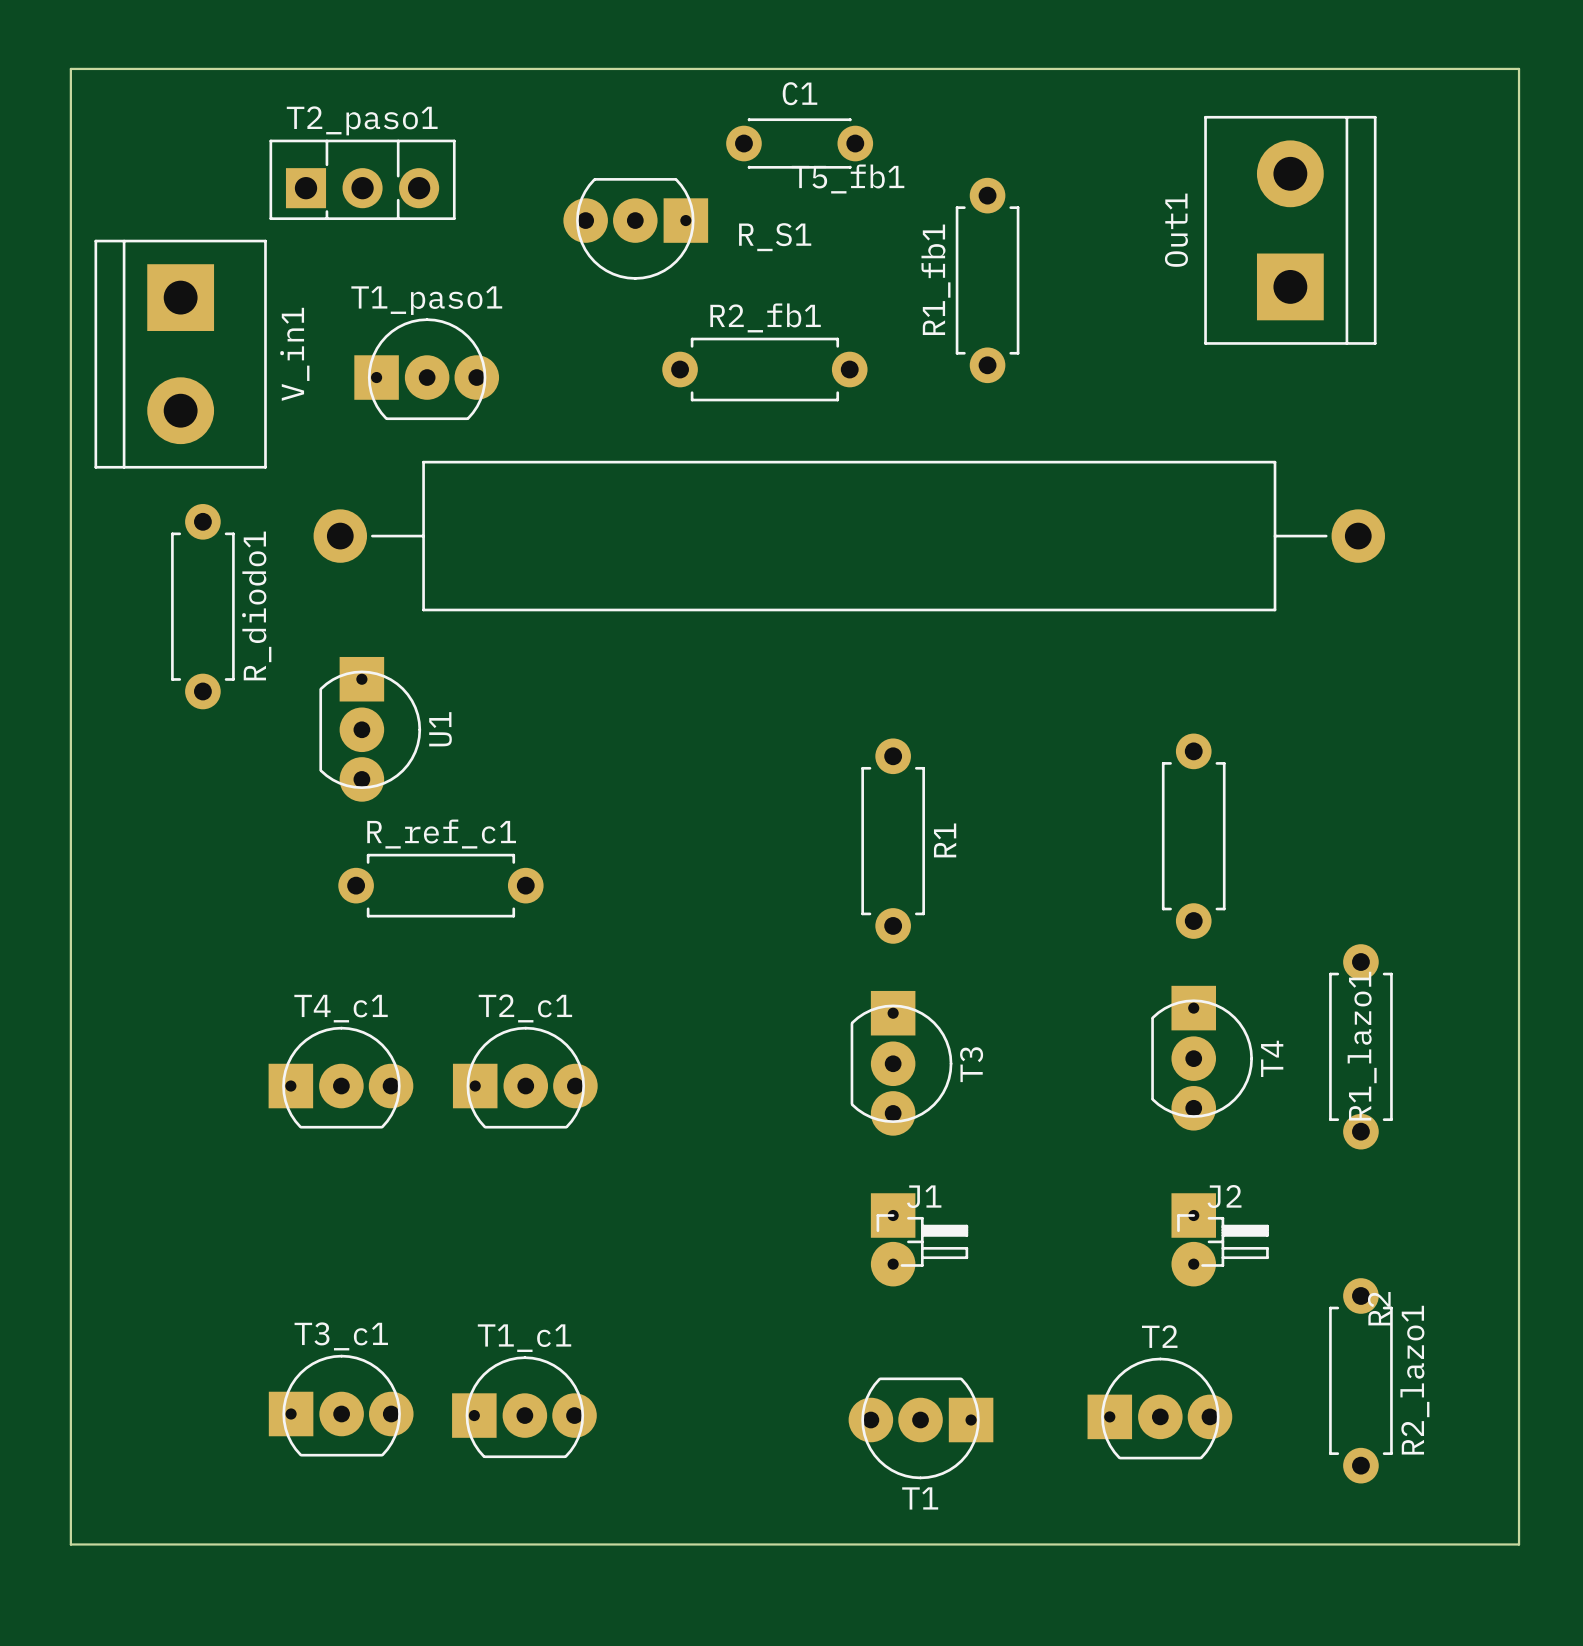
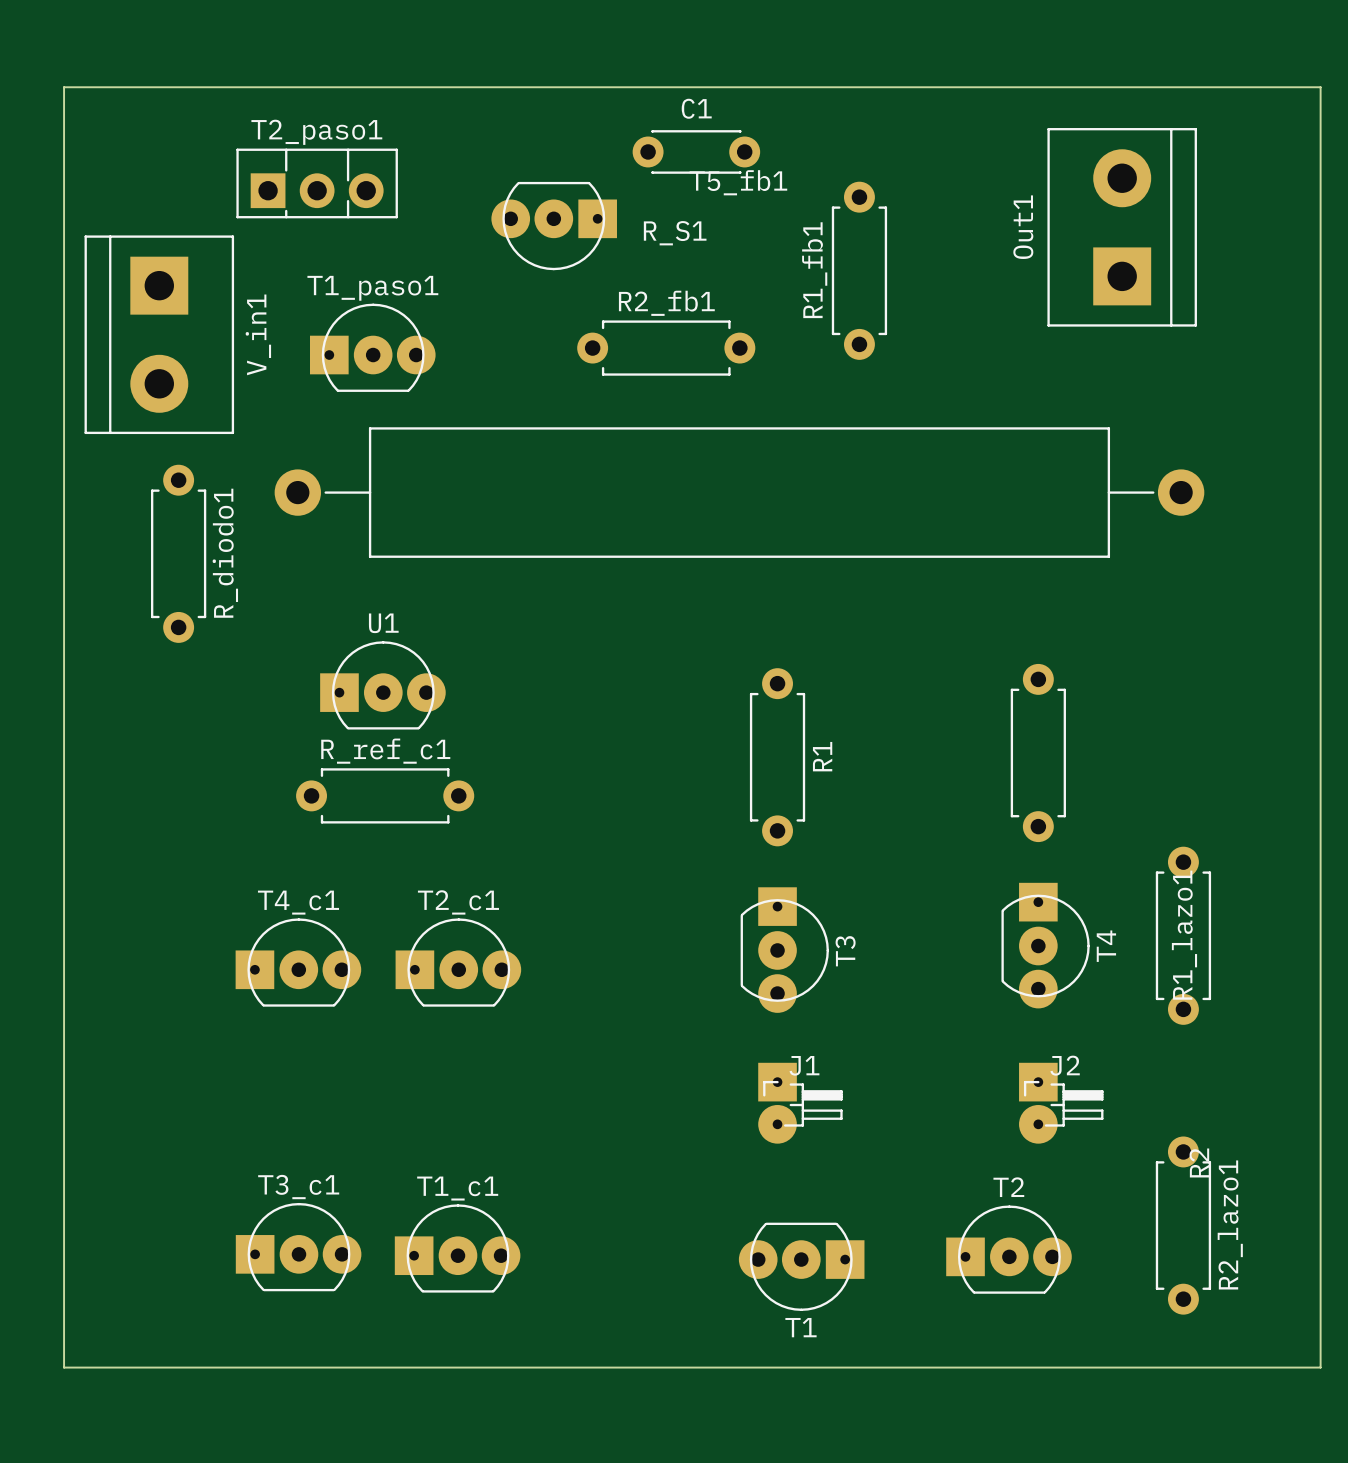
U1 rotation: 0° (370, 729) -> 90° counterclockwise (382, 685)

